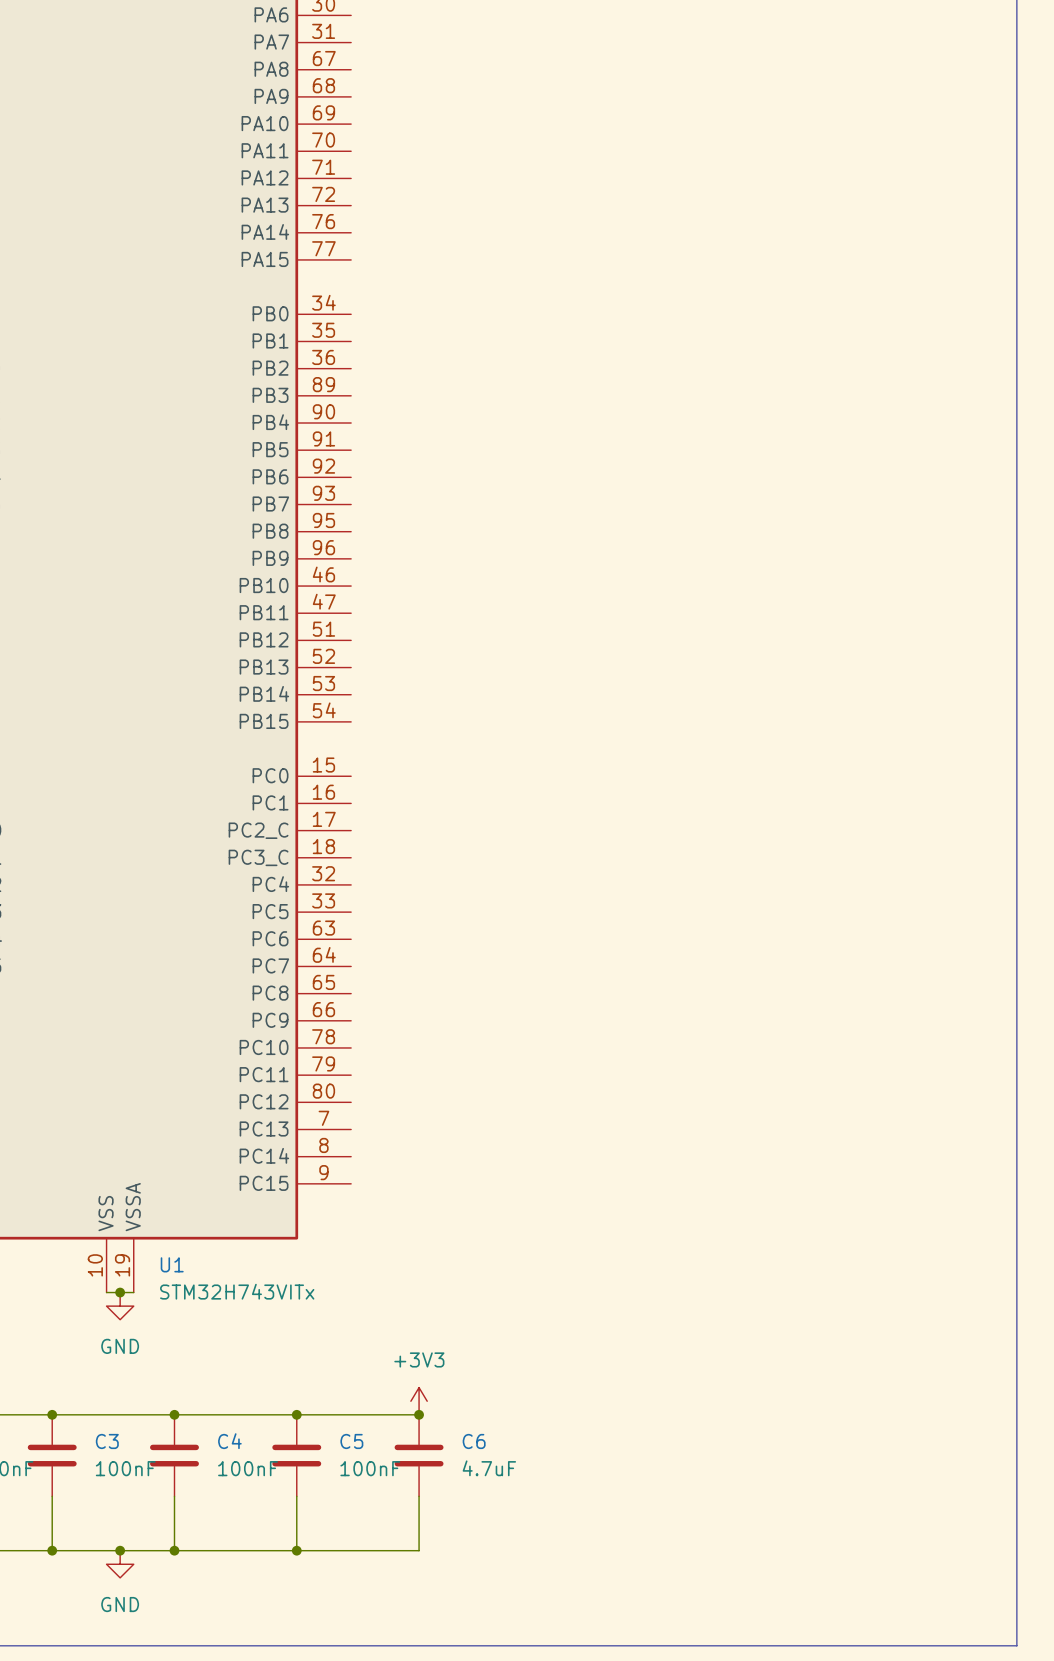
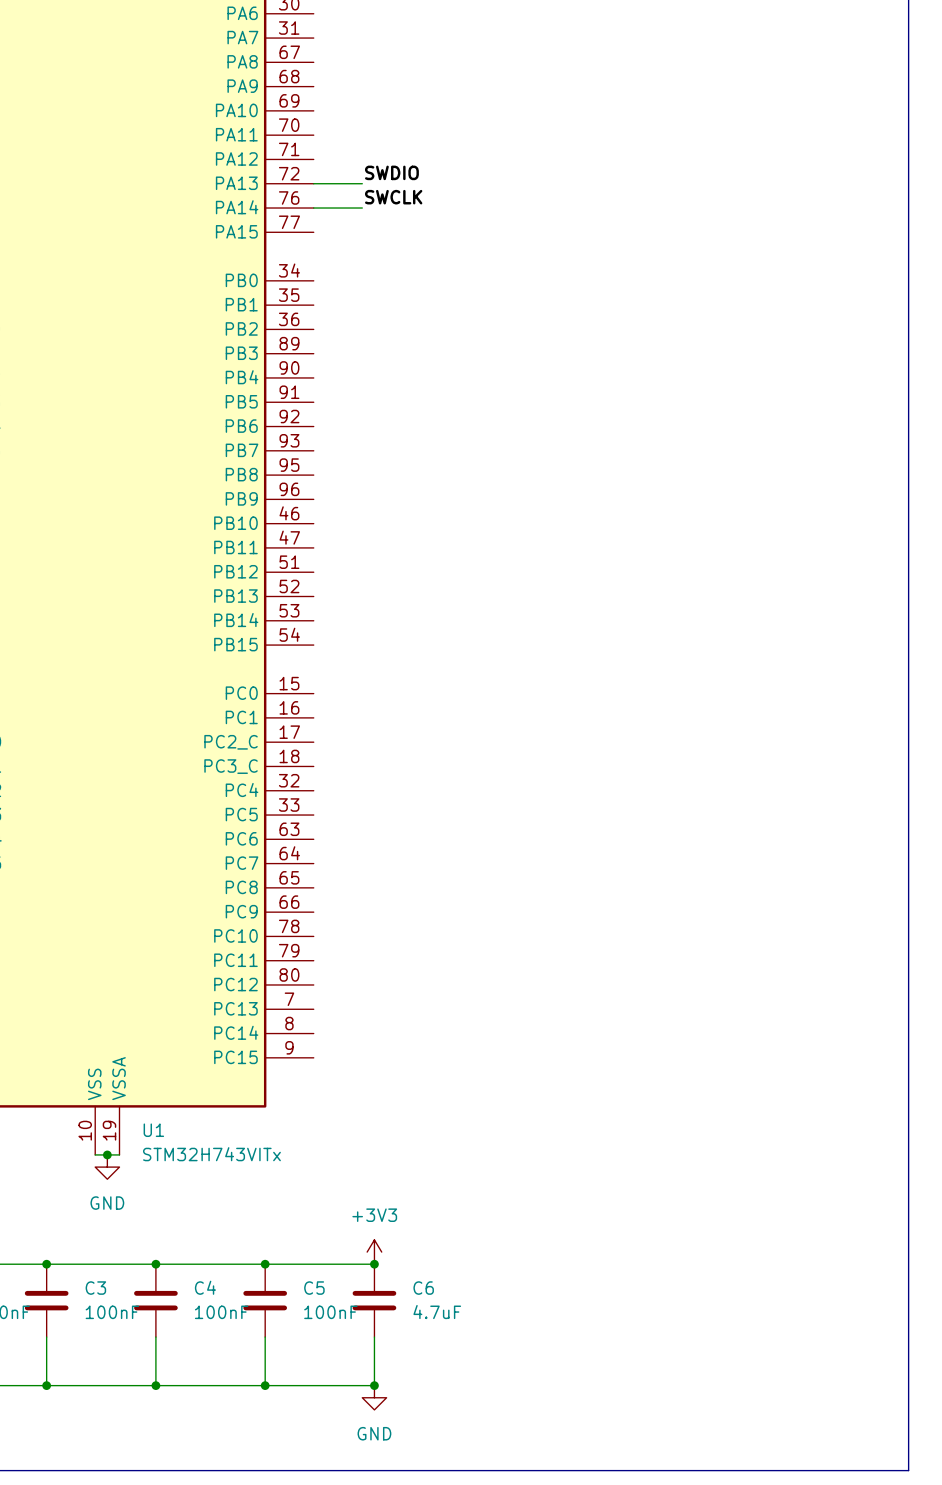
label: none -> SWDIO (391, 172)
wire: none -> (313, 183) (362, 183)
label: none -> SWCLK (393, 197)
wire: none -> (313, 208) (362, 208)
junction: (120, 1550) -> none
junction: none -> (374, 1385)
power symbol: GND (120, 1564) -> none
power symbol: none -> GND (374, 1397)

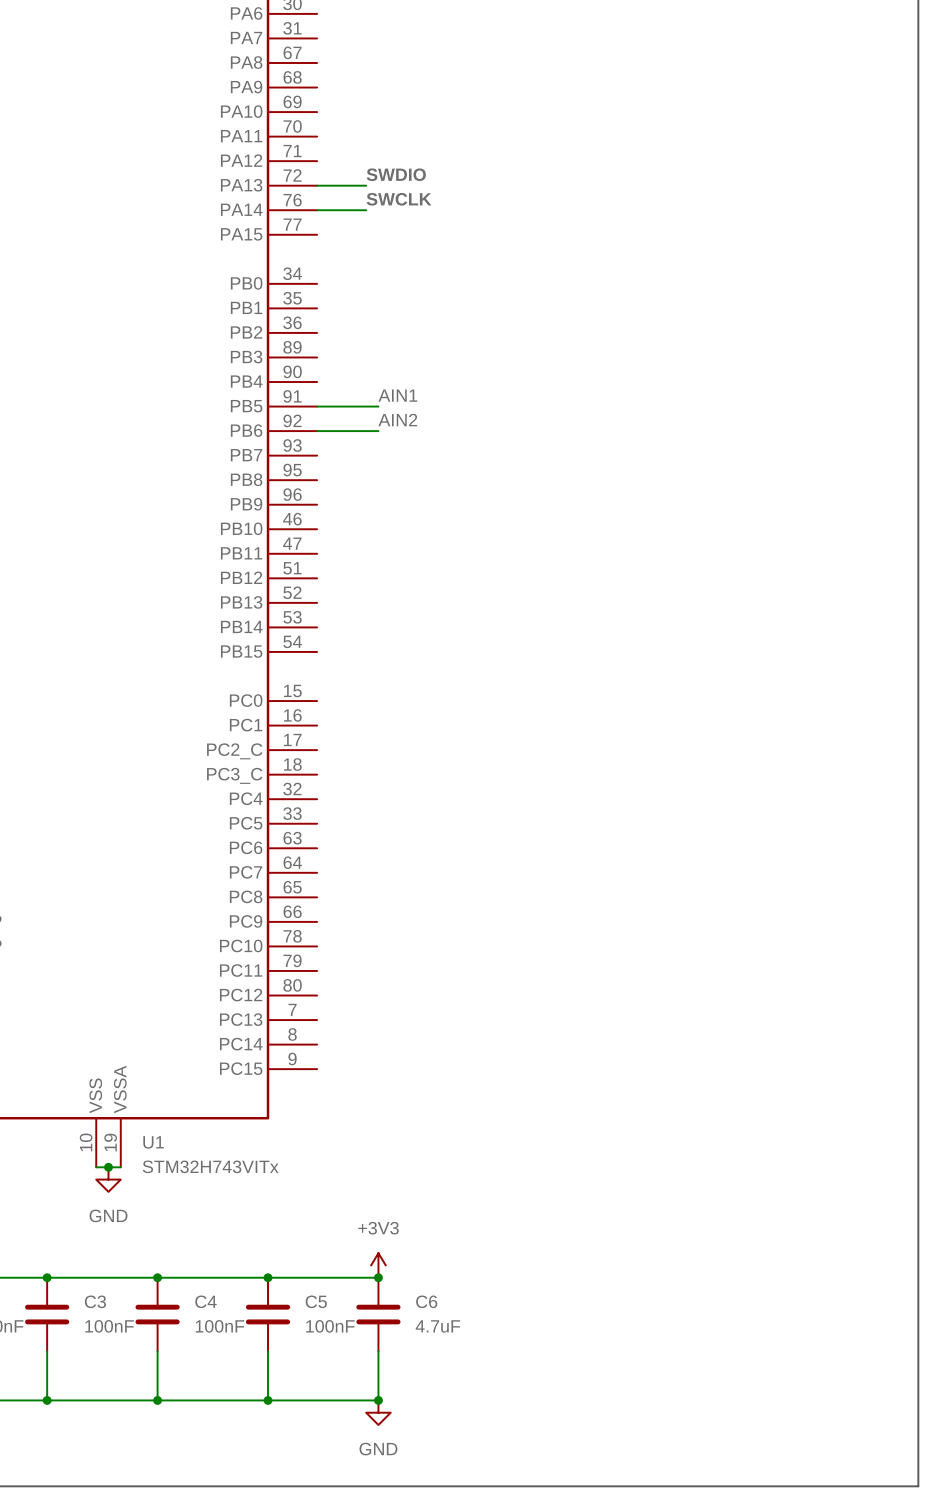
label: none -> AIN1 (397, 395)
wire: none -> (317, 406) (378, 406)
label: none -> AIN2 (397, 420)
wire: none -> (317, 431) (378, 431)

